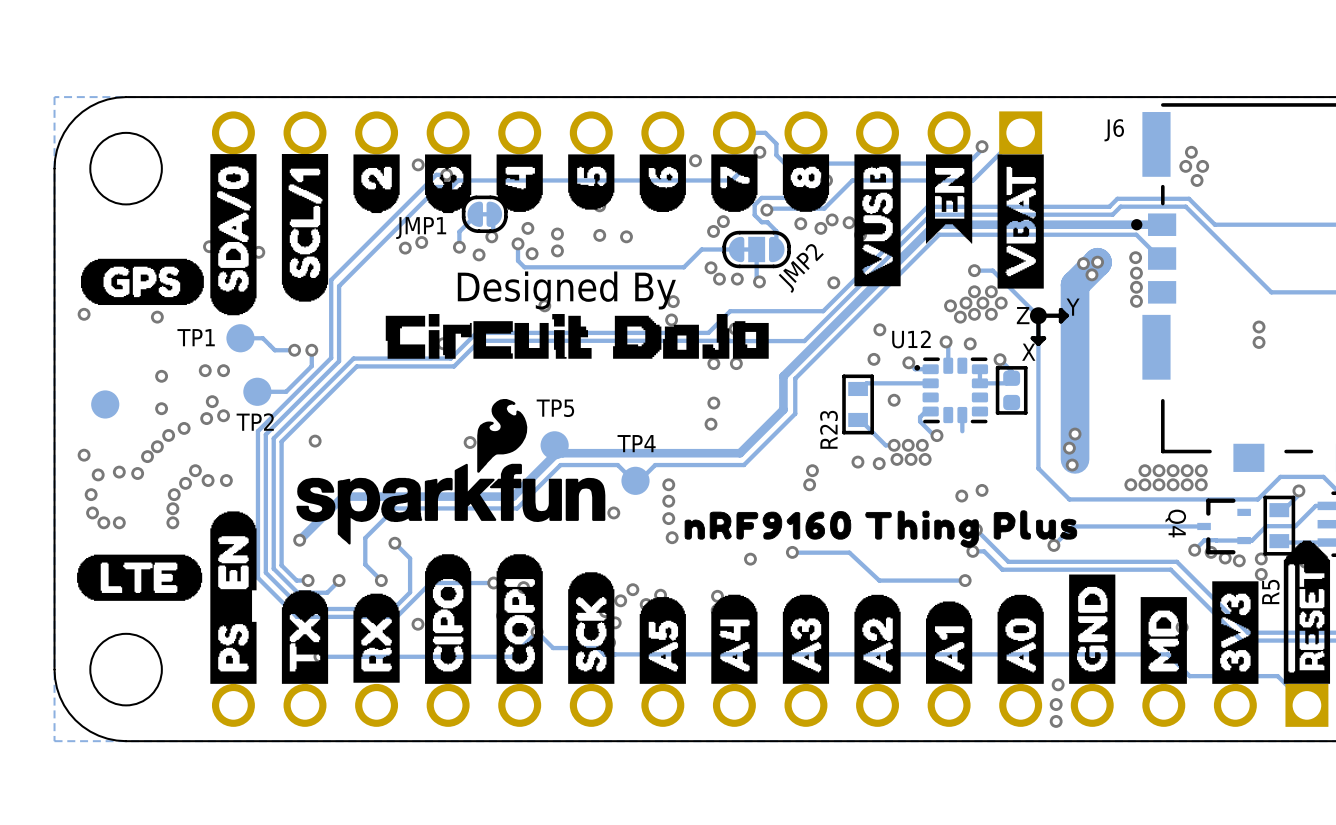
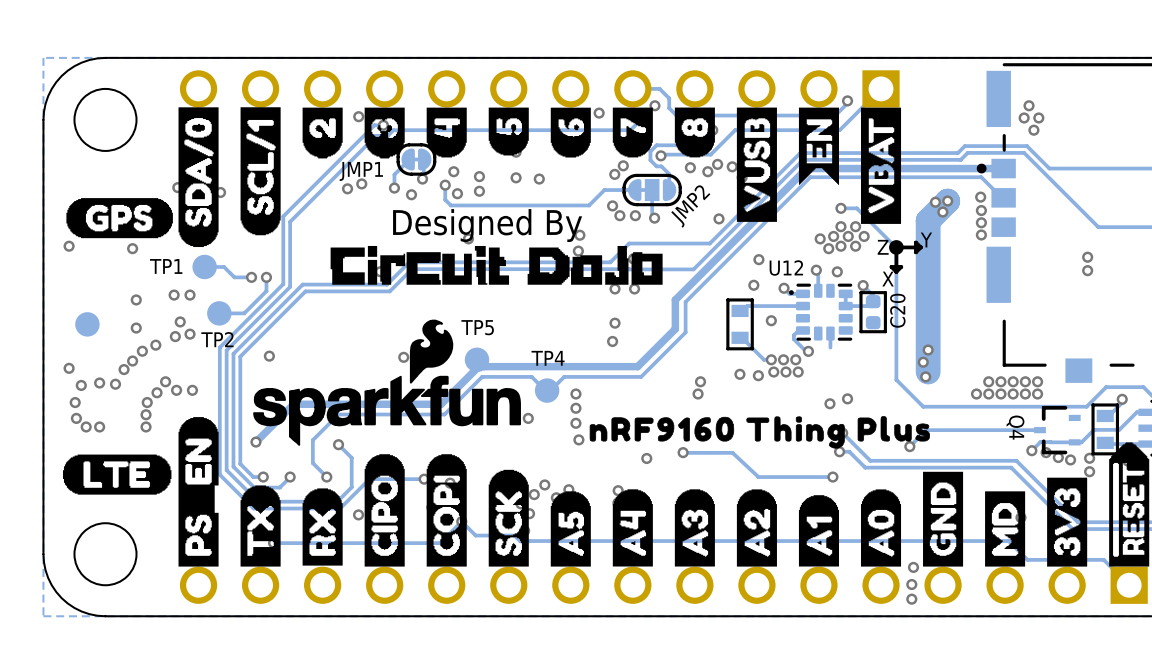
J6 name: J6 (1114, 130) -> none
C20 name: none -> C20 (897, 310)
R23 name: R23 (828, 429) -> none
R5 name: R5 (1270, 591) -> none

